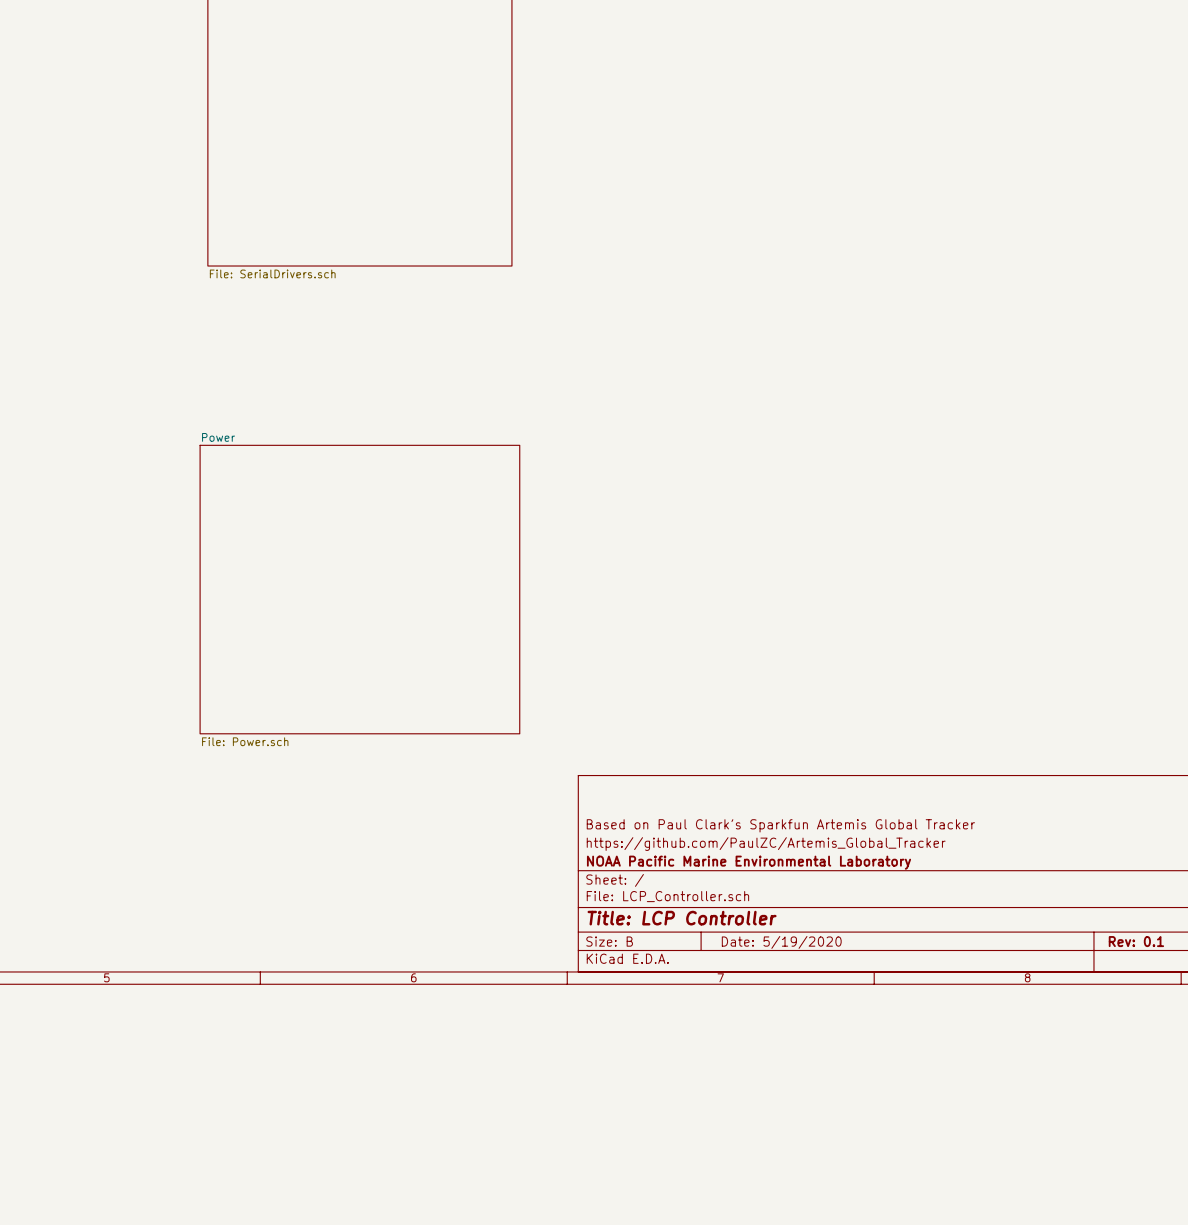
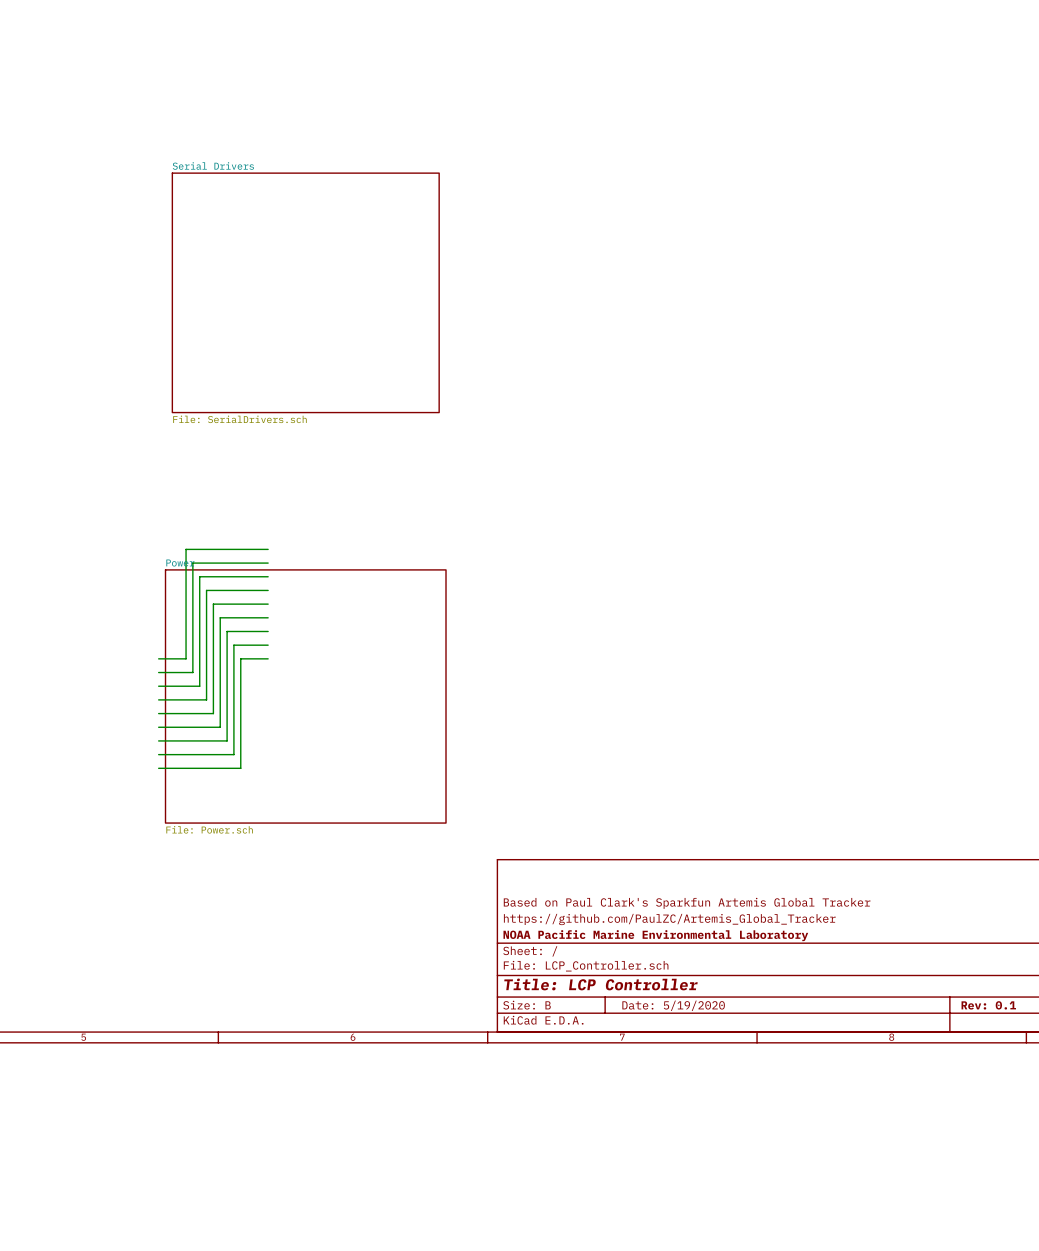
wire: none -> (268, 549) (186, 549) (186, 658) (158, 658)
wire: none -> (268, 563) (192, 563) (192, 672) (158, 672)
wire: none -> (268, 576) (199, 576) (199, 686) (158, 686)
wire: none -> (268, 590) (206, 590) (206, 699) (158, 699)
wire: none -> (268, 604) (213, 604) (213, 713) (158, 713)
wire: none -> (268, 617) (220, 617) (220, 727) (158, 727)
wire: none -> (268, 631) (227, 631) (227, 740) (158, 740)
wire: none -> (268, 645) (233, 645) (233, 754) (158, 754)
wire: none -> (268, 658) (240, 658) (240, 768) (158, 768)

